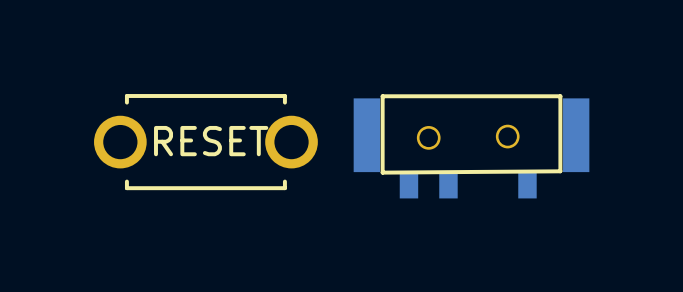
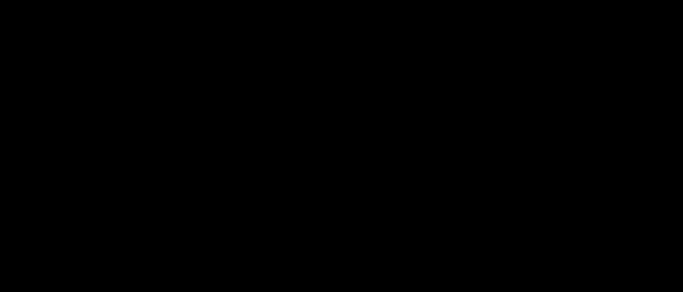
part: (205, 142) -> none
part: (471, 146) -> none

